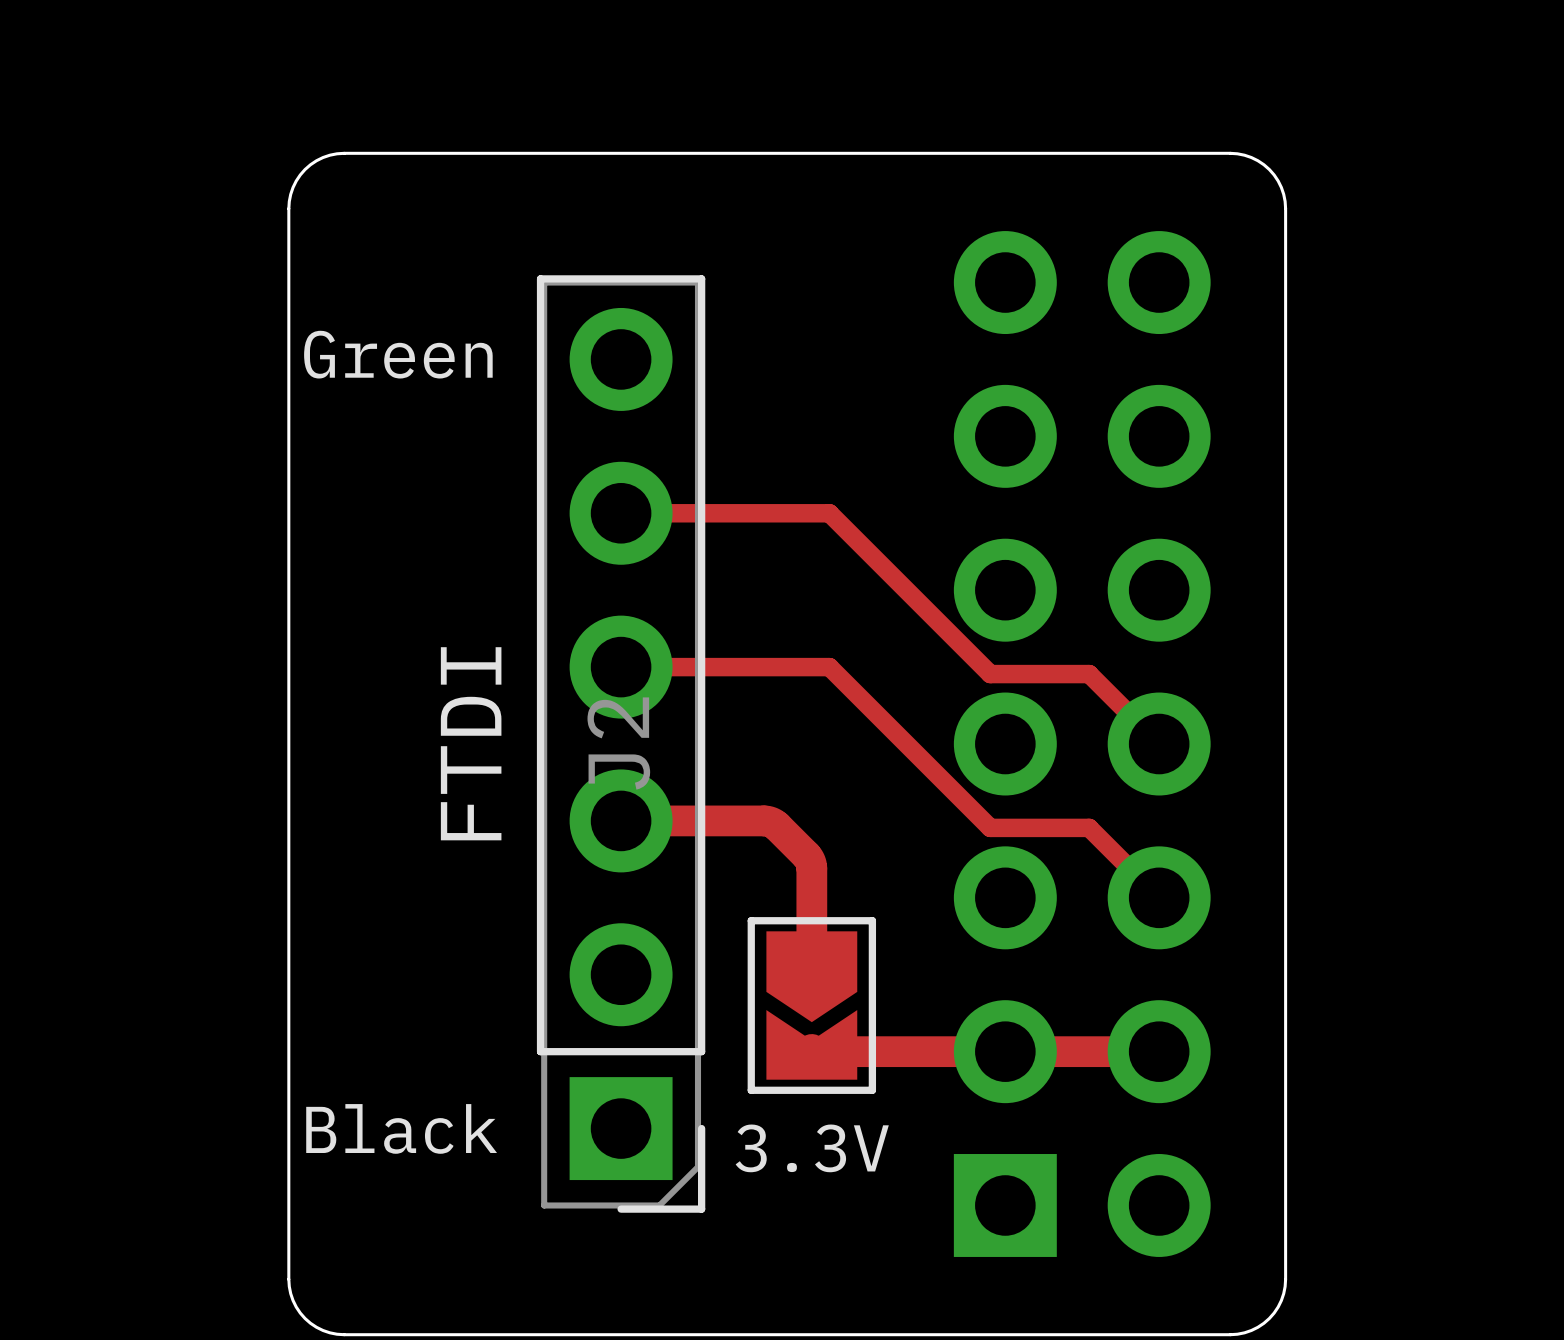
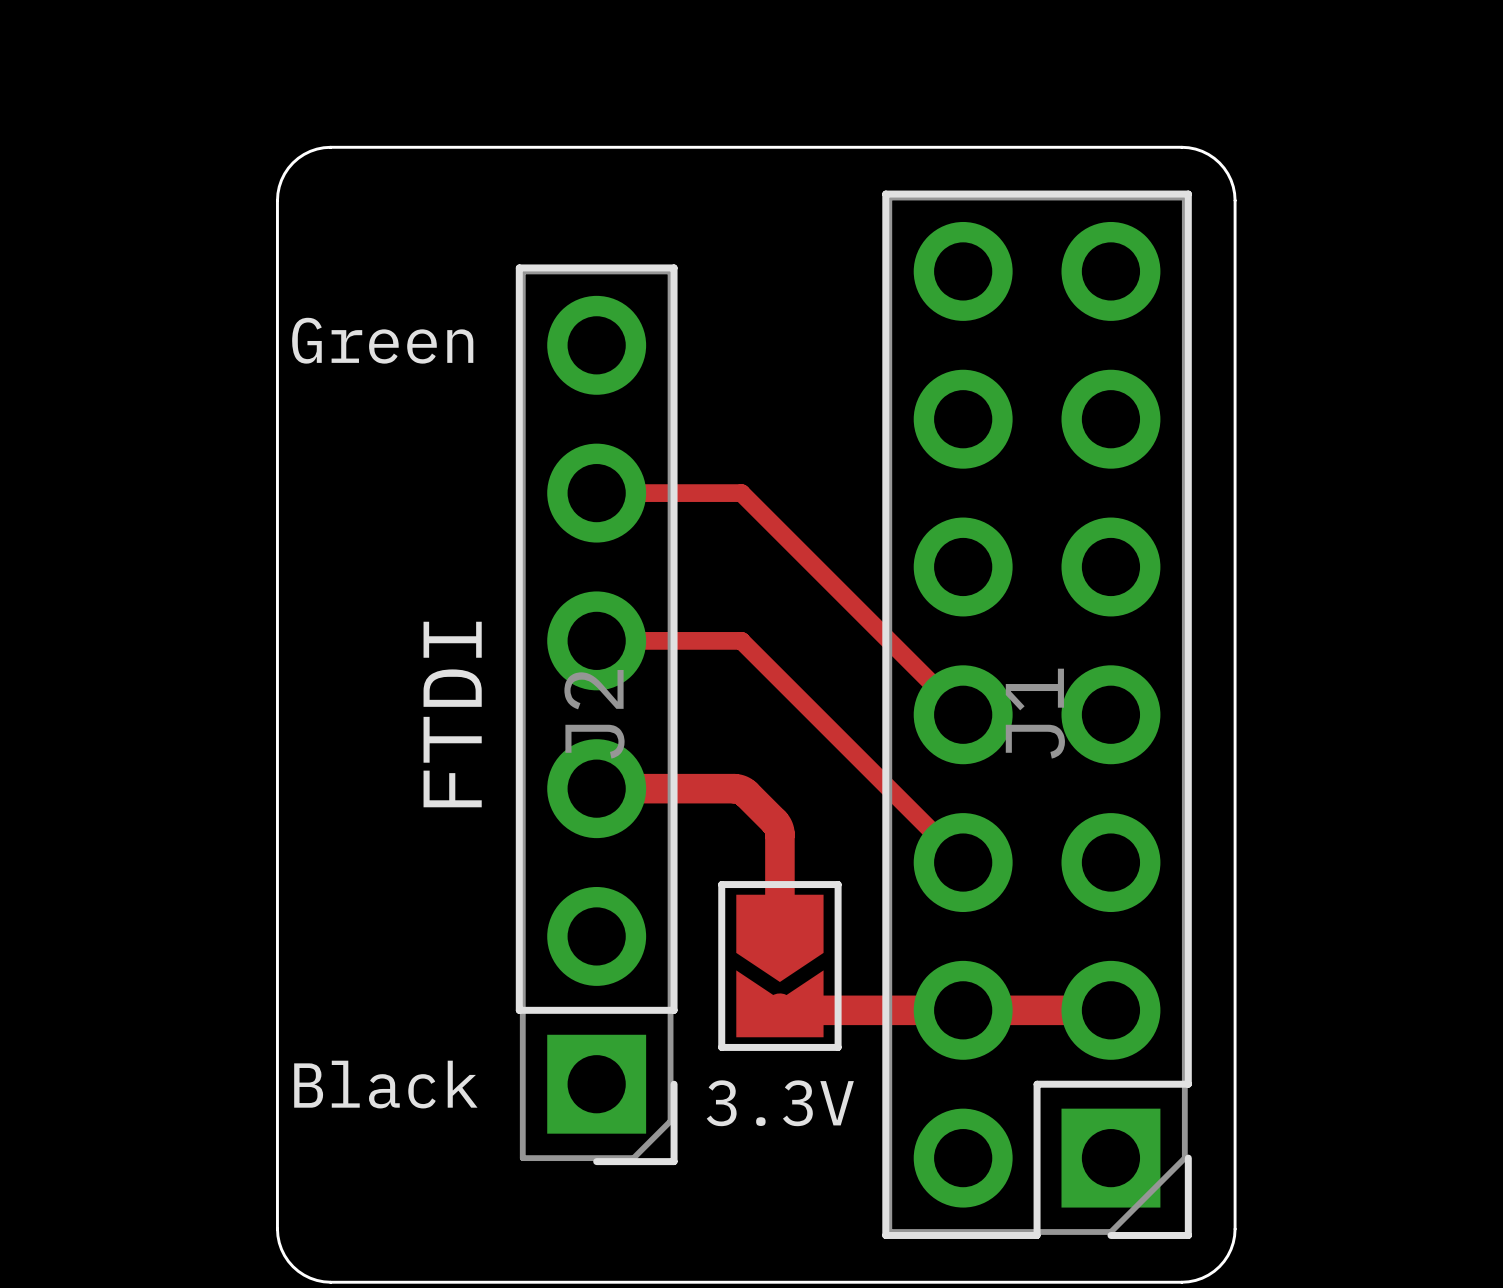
track: (771, 513) (829, 513) (990, 674) (1089, 674) (1159, 744) -> (741, 493) (963, 714)
track: (771, 667) (829, 667) (990, 827) (1089, 827) (1159, 897) -> (741, 640) (963, 862)
J1 side: bottom (1082, 744) -> top (1037, 714)

